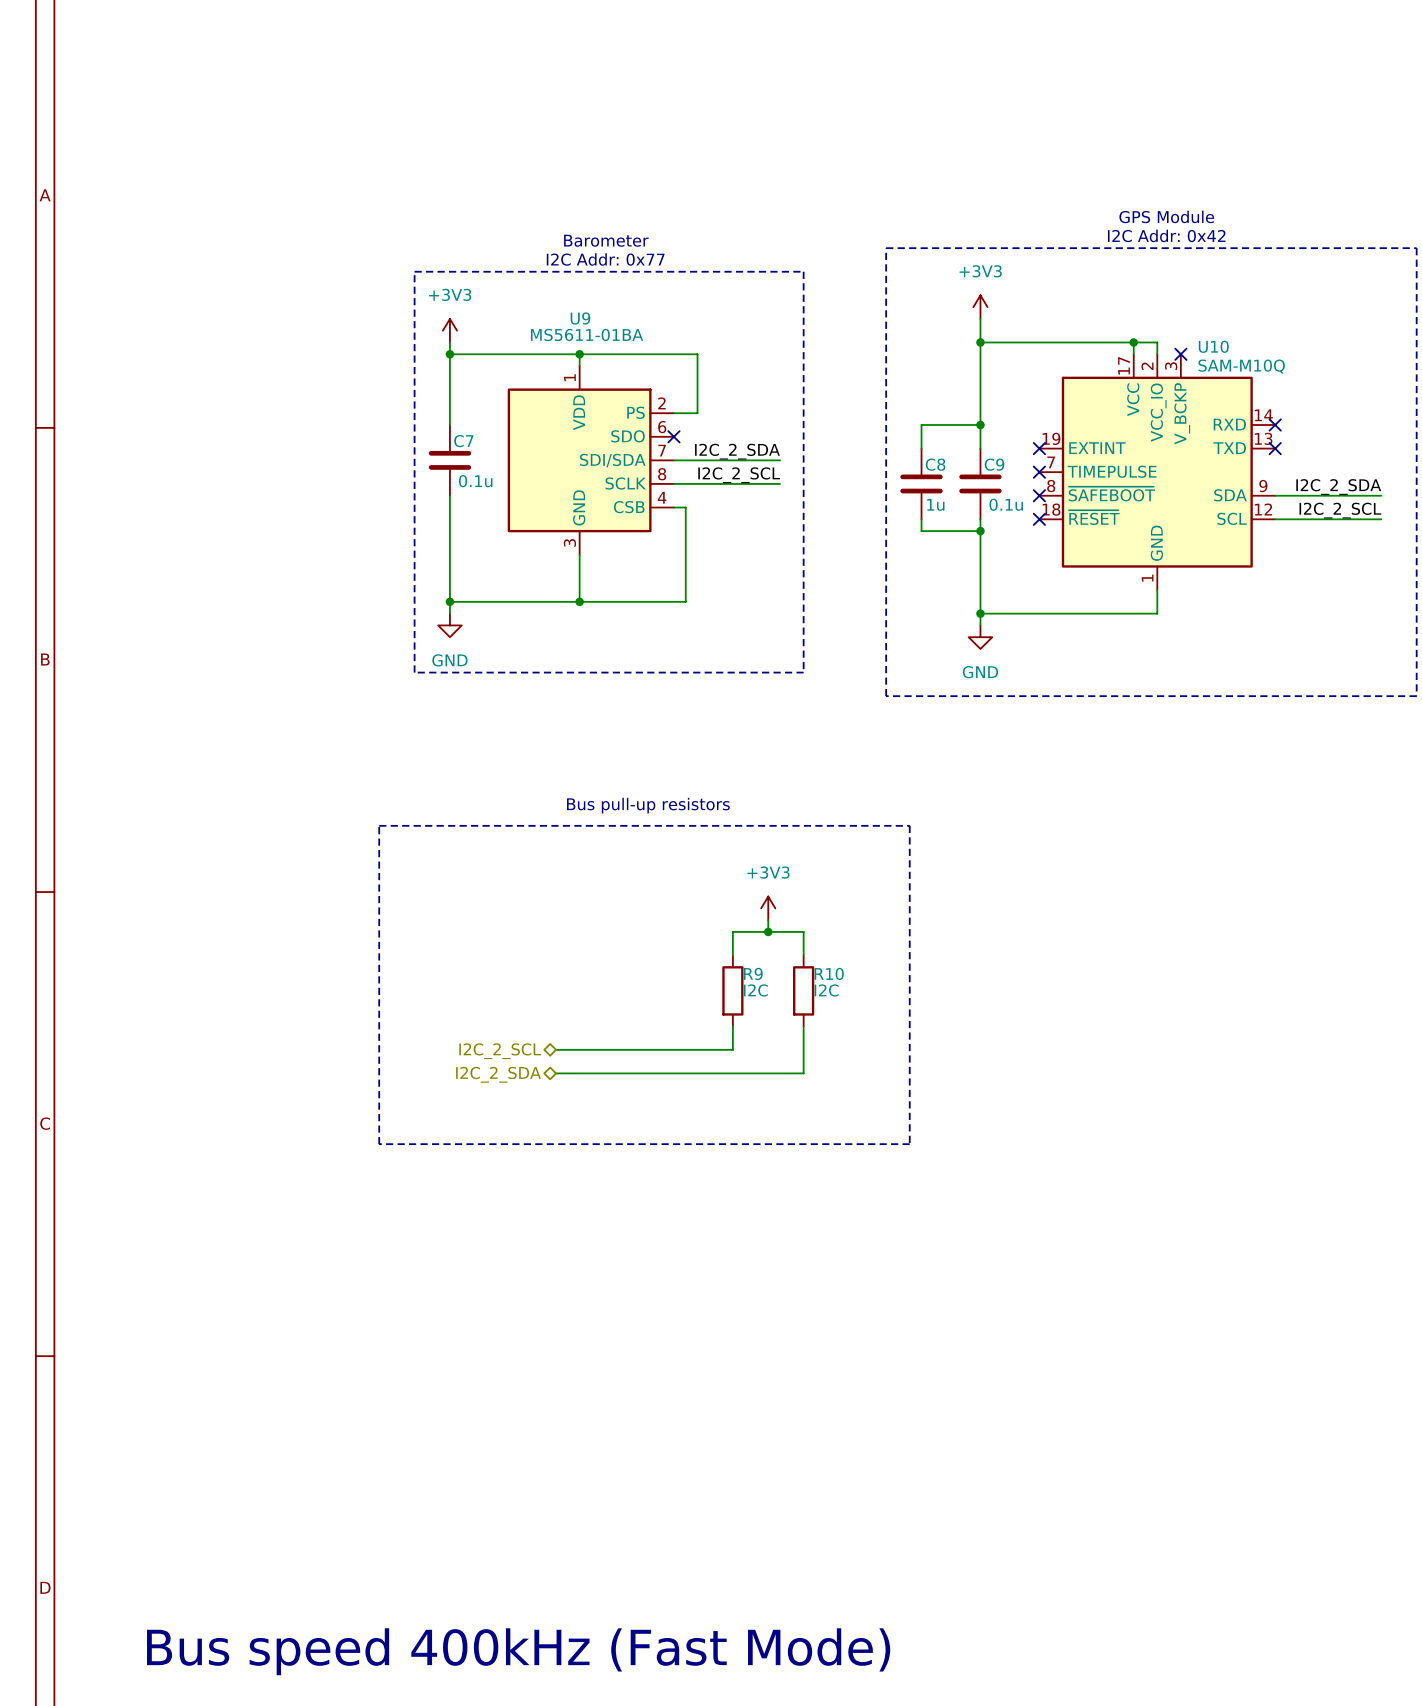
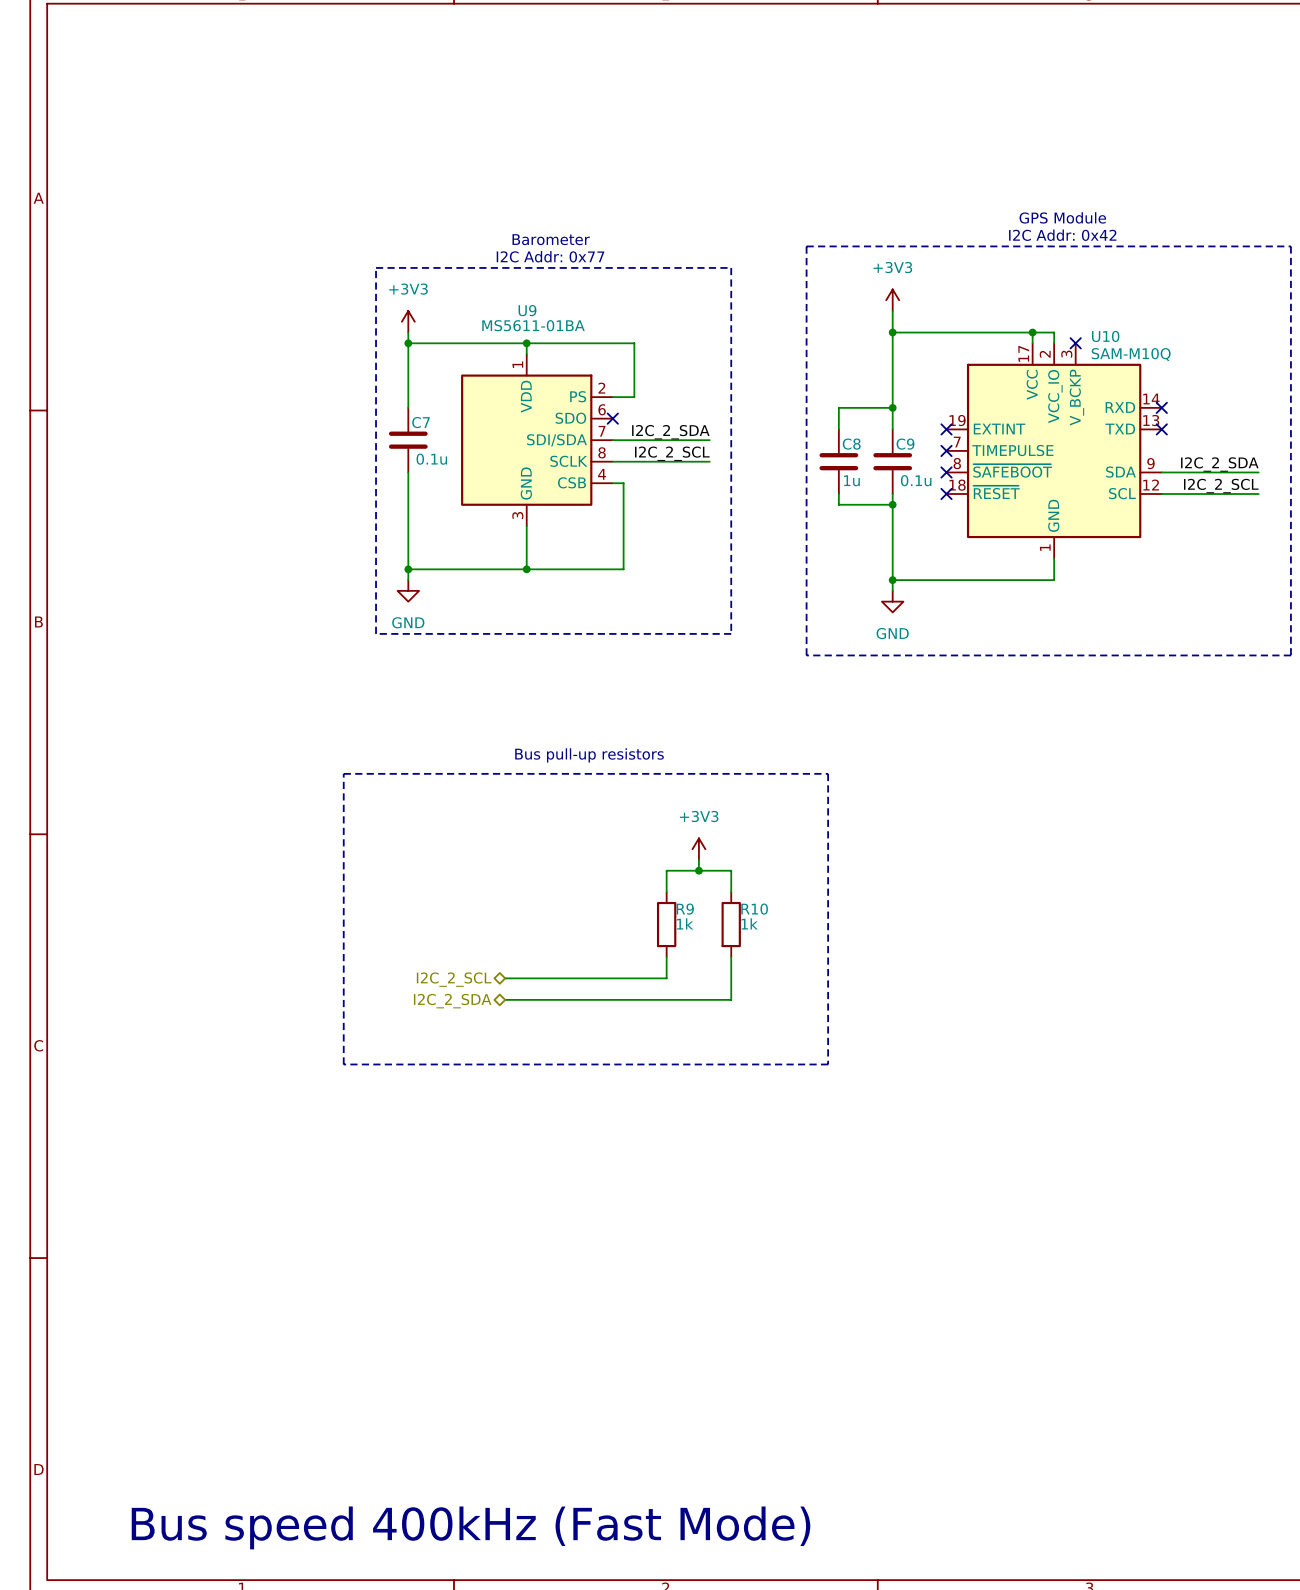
R9 value: I2C (755, 990) -> 1k (685, 923)
R10 value: I2C (826, 990) -> 1k (749, 923)

